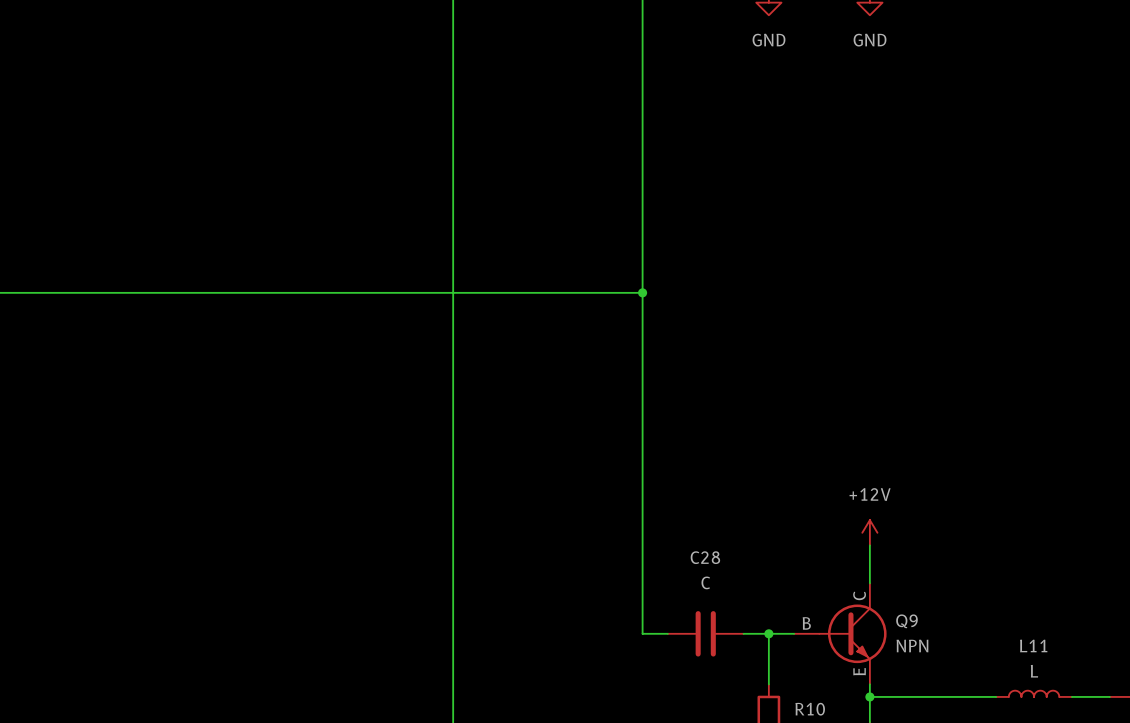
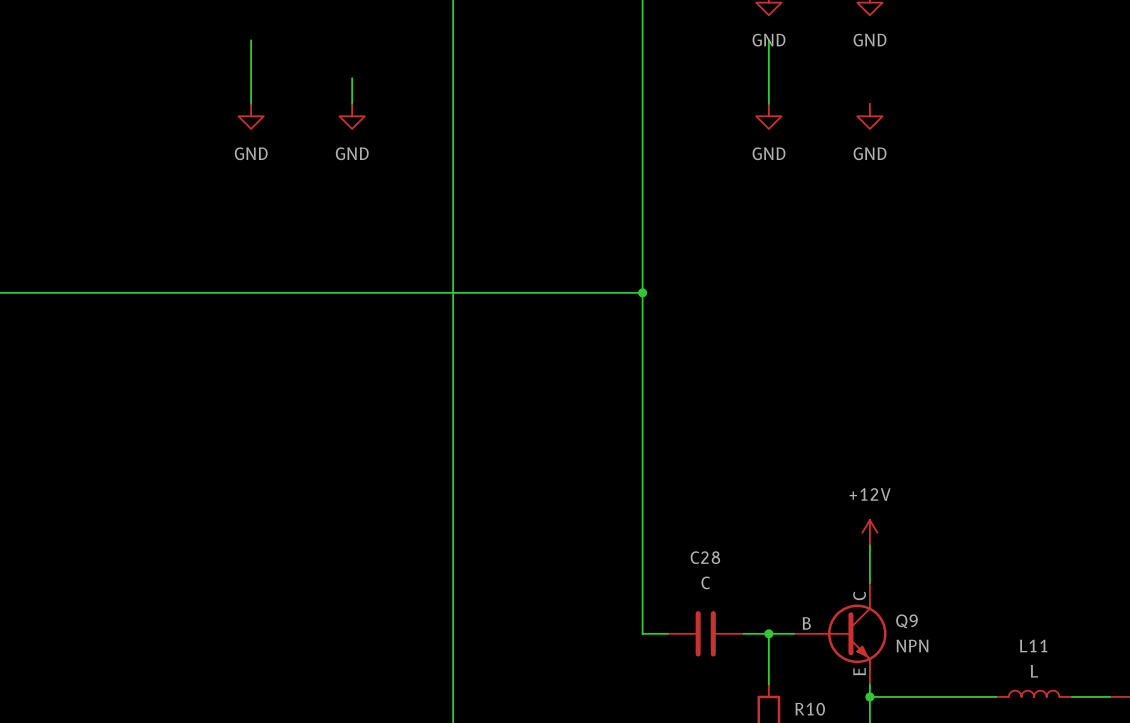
wire: none -> (251, 40) (251, 103)
wire: none -> (768, 40) (768, 103)
wire: none -> (352, 78) (352, 103)
power symbol: none -> GND (251, 116)
power symbol: none -> GND (352, 116)
power symbol: none -> GND (768, 116)
power symbol: none -> GND (869, 116)

